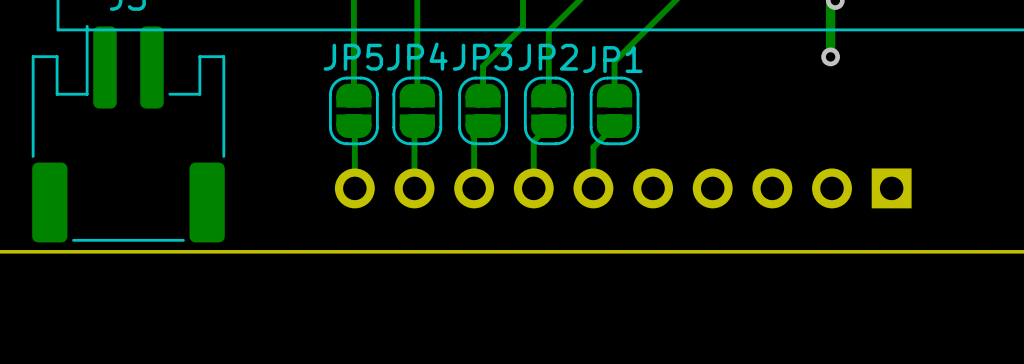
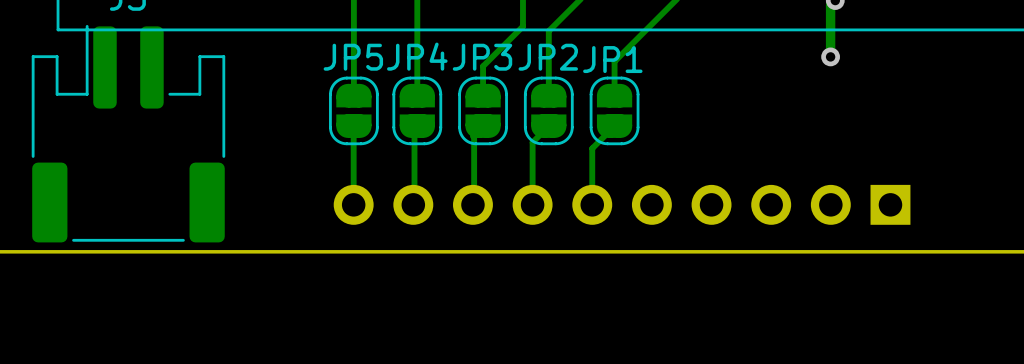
track: (353, 126) (354, 188) -> (353, 126) (353, 204)
track: (533, 141) (533, 188) -> (533, 141) (532, 204)
track: (593, 147) (593, 188) -> (593, 147) (592, 204)
part position: (623, 188) -> (622, 204)

